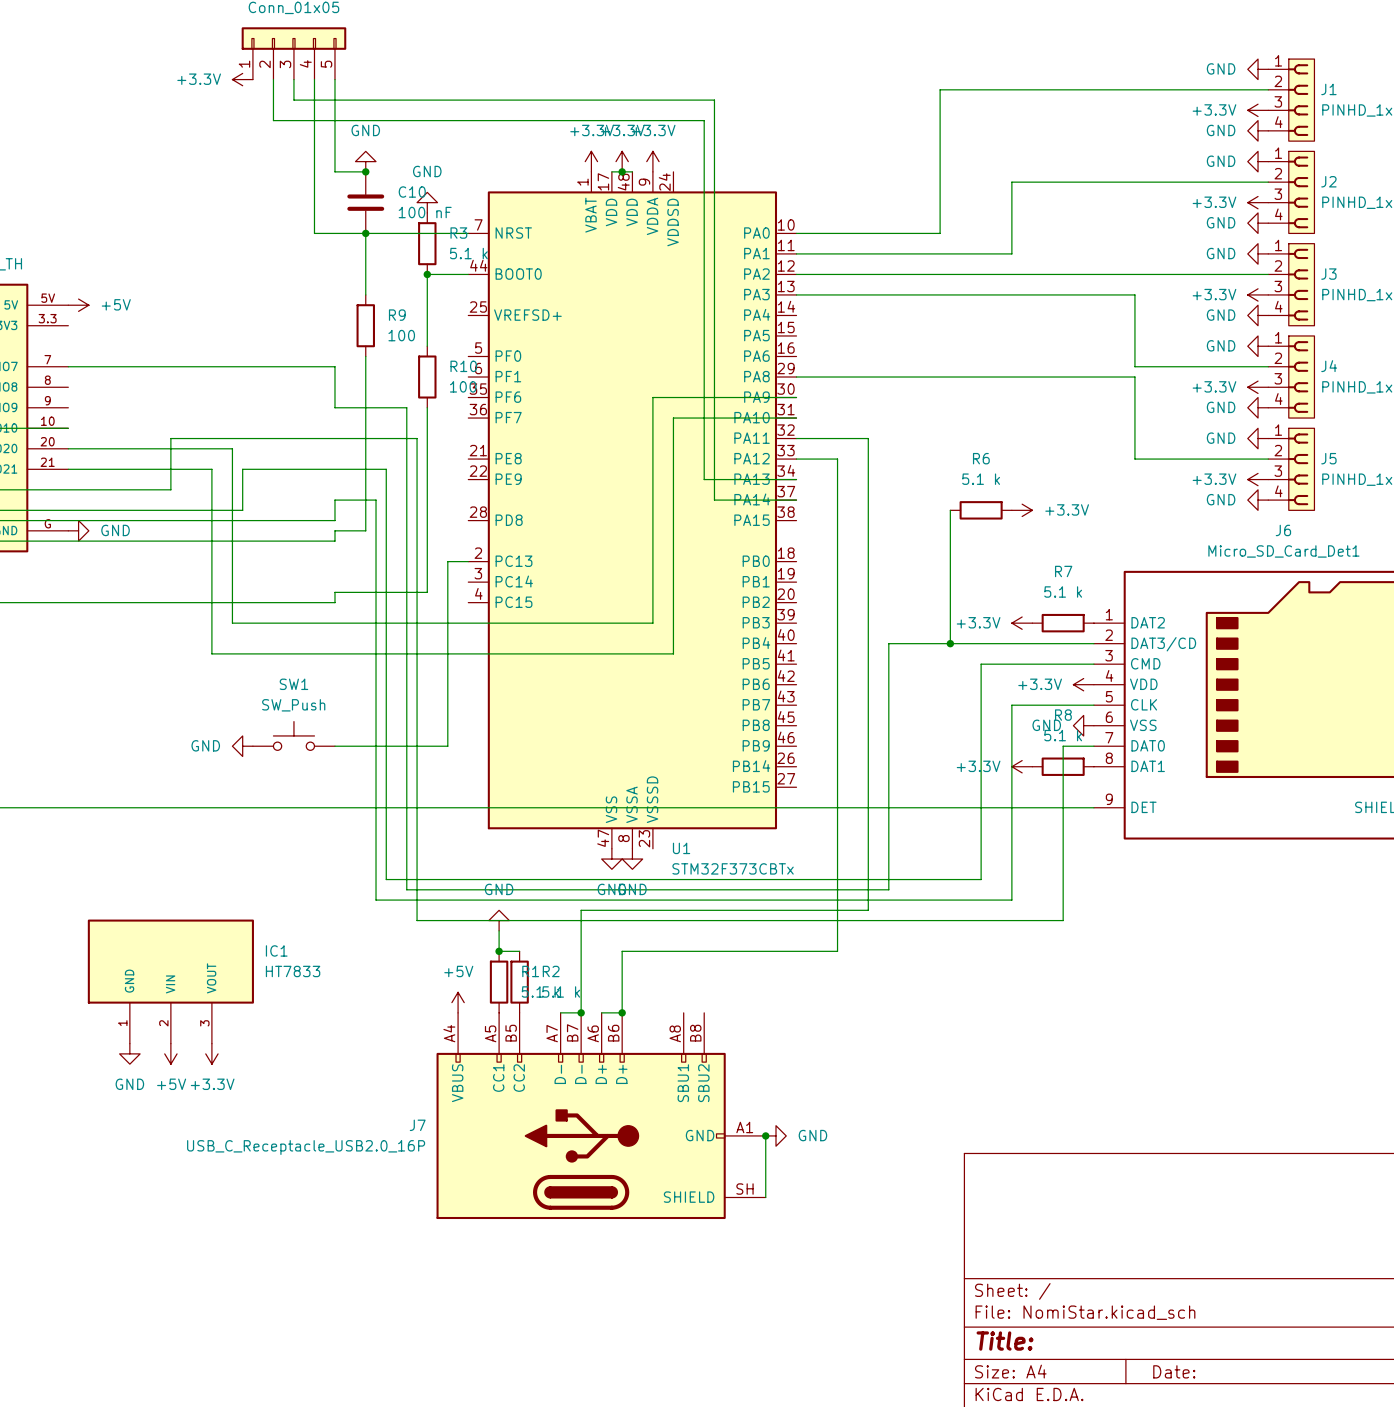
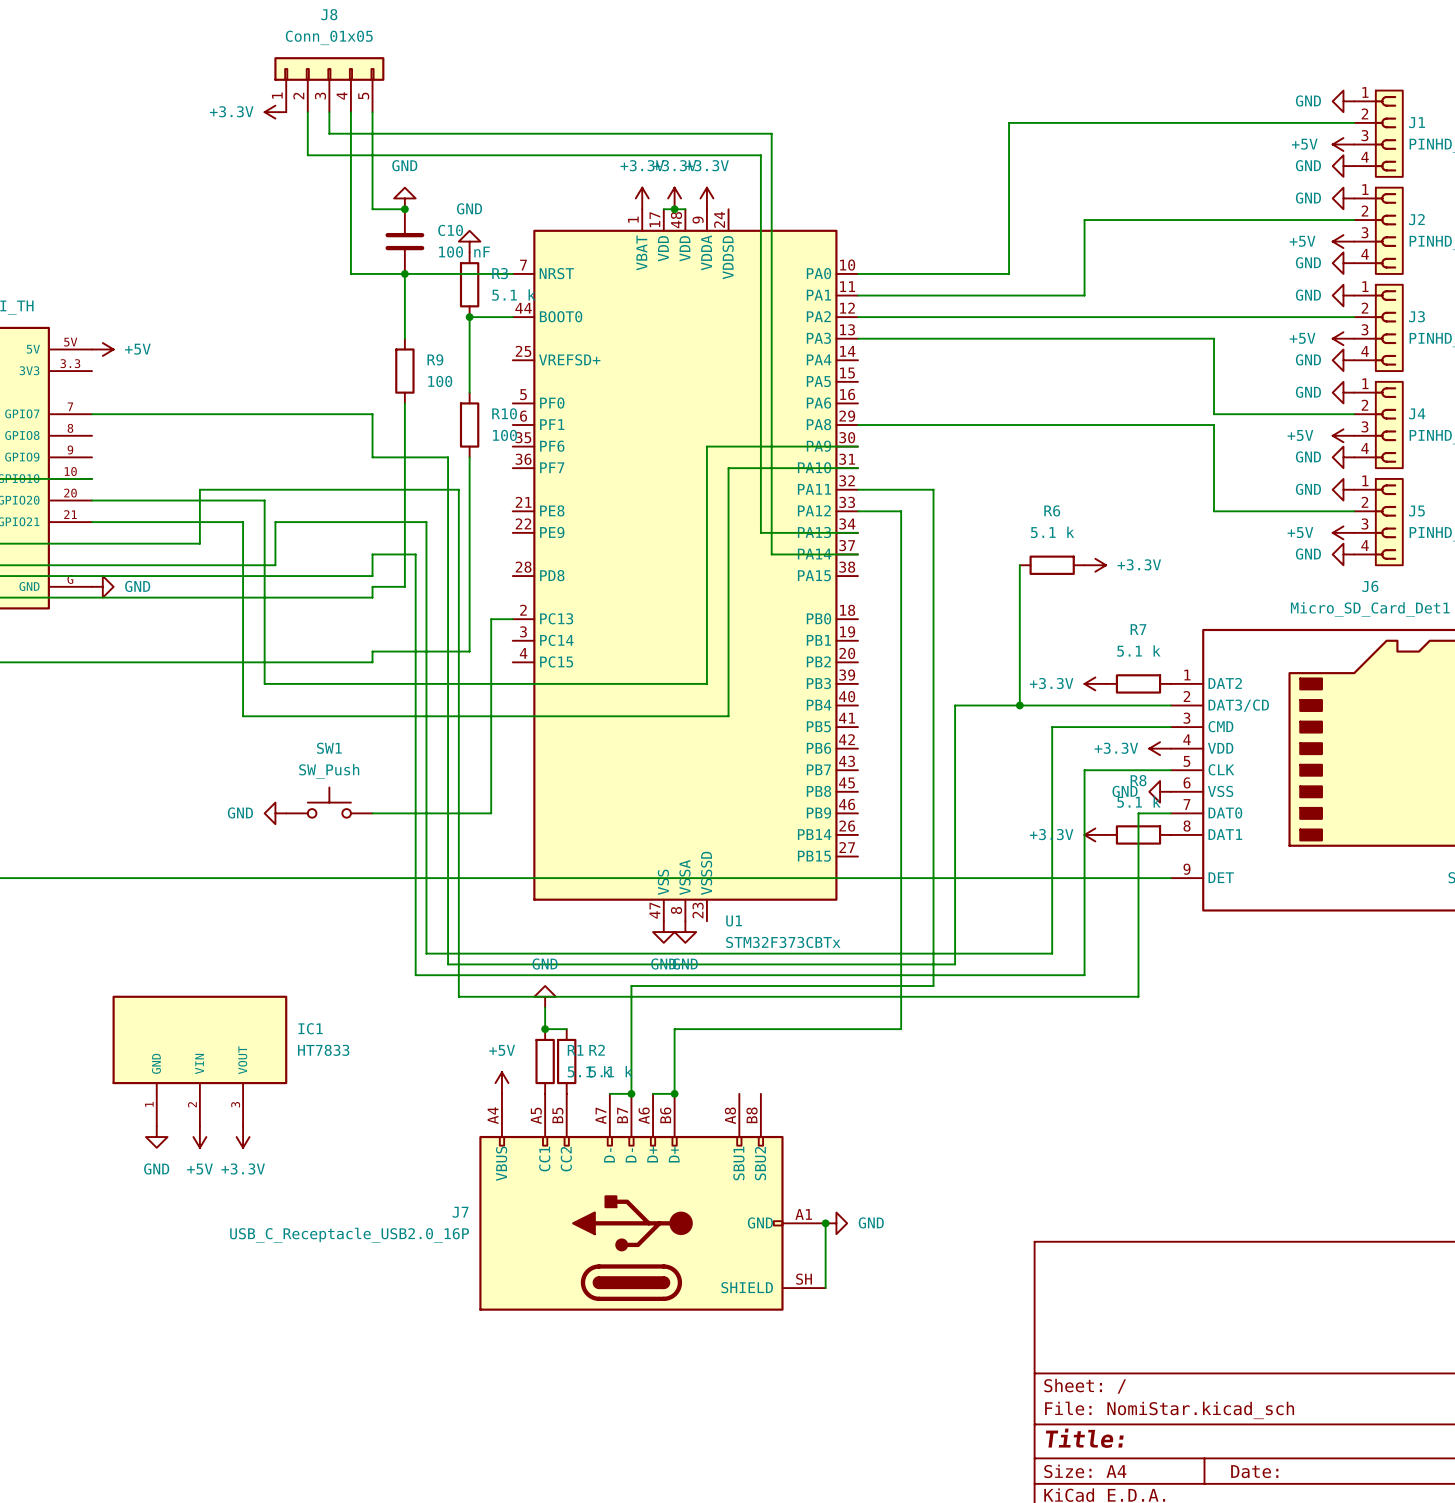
power symbol: +3.3V (1258, 110) -> +5V (1343, 144)
power symbol: +3.3V (1258, 202) -> +5V (1343, 241)
power symbol: +3.3V (1258, 294) -> +5V (1343, 338)
power symbol: +3.3V (1258, 387) -> +5V (1343, 435)
power symbol: +3.3V (1258, 479) -> +5V (1343, 532)

